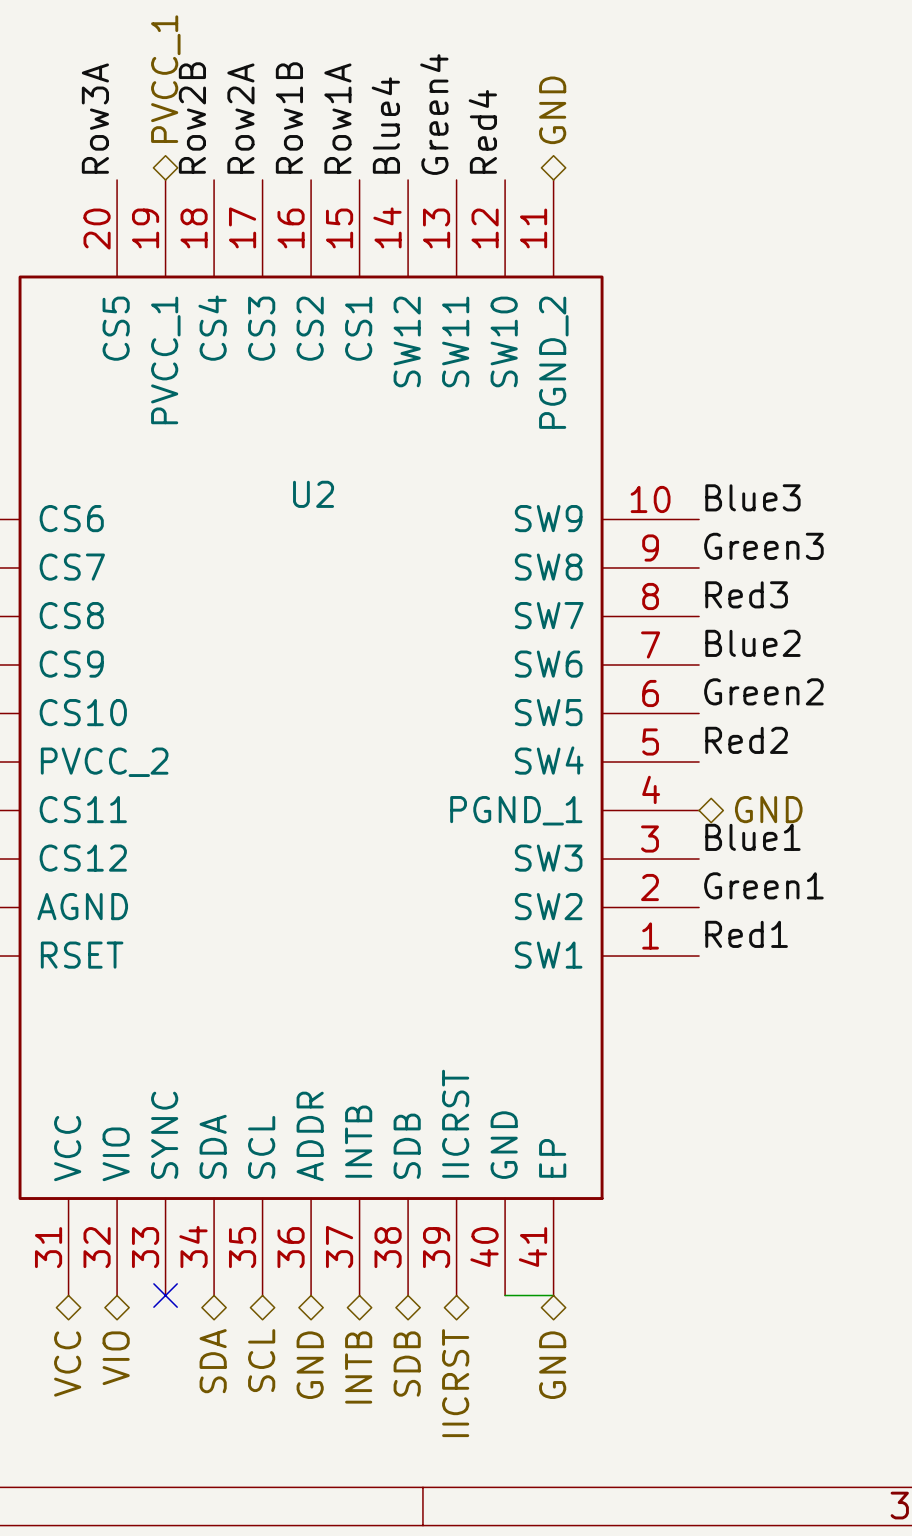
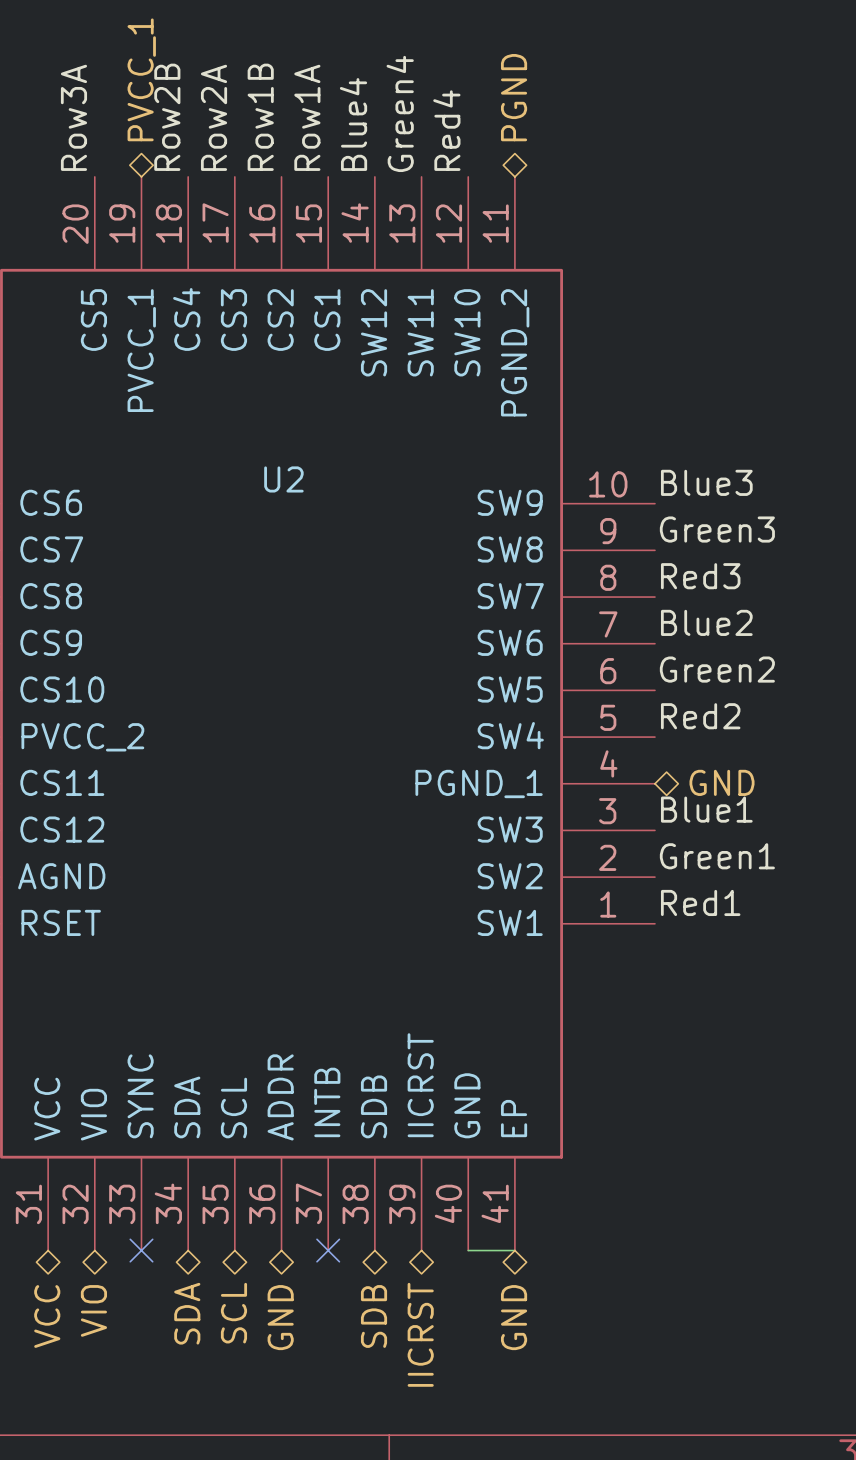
hierarchical label: GND (552, 110) -> PGND (514, 97)
no-connect mark: none -> (328, 1250)
hierarchical label: INTB (358, 1367) -> none

